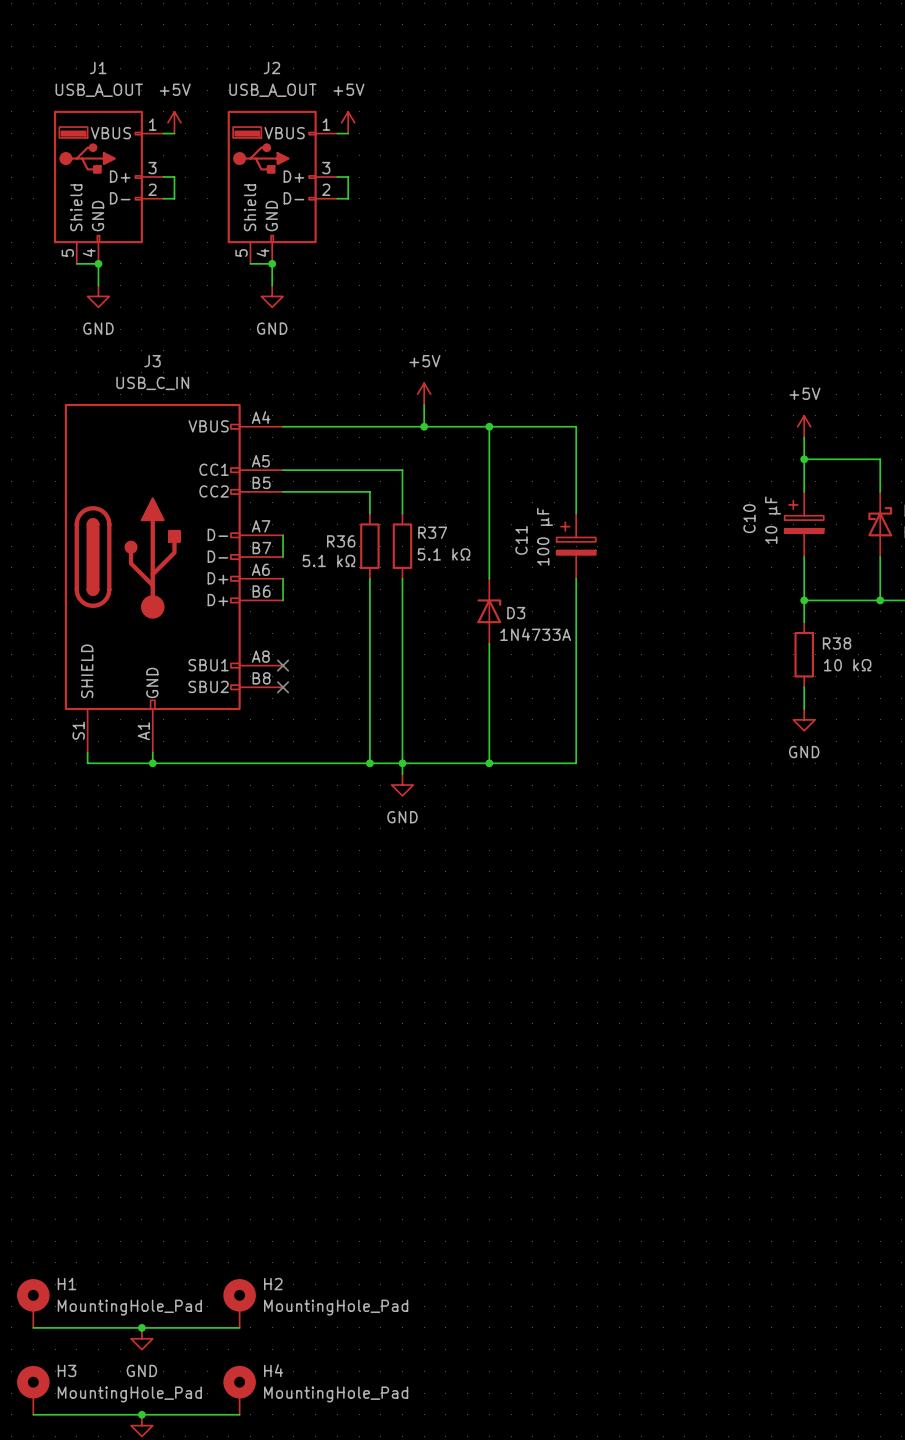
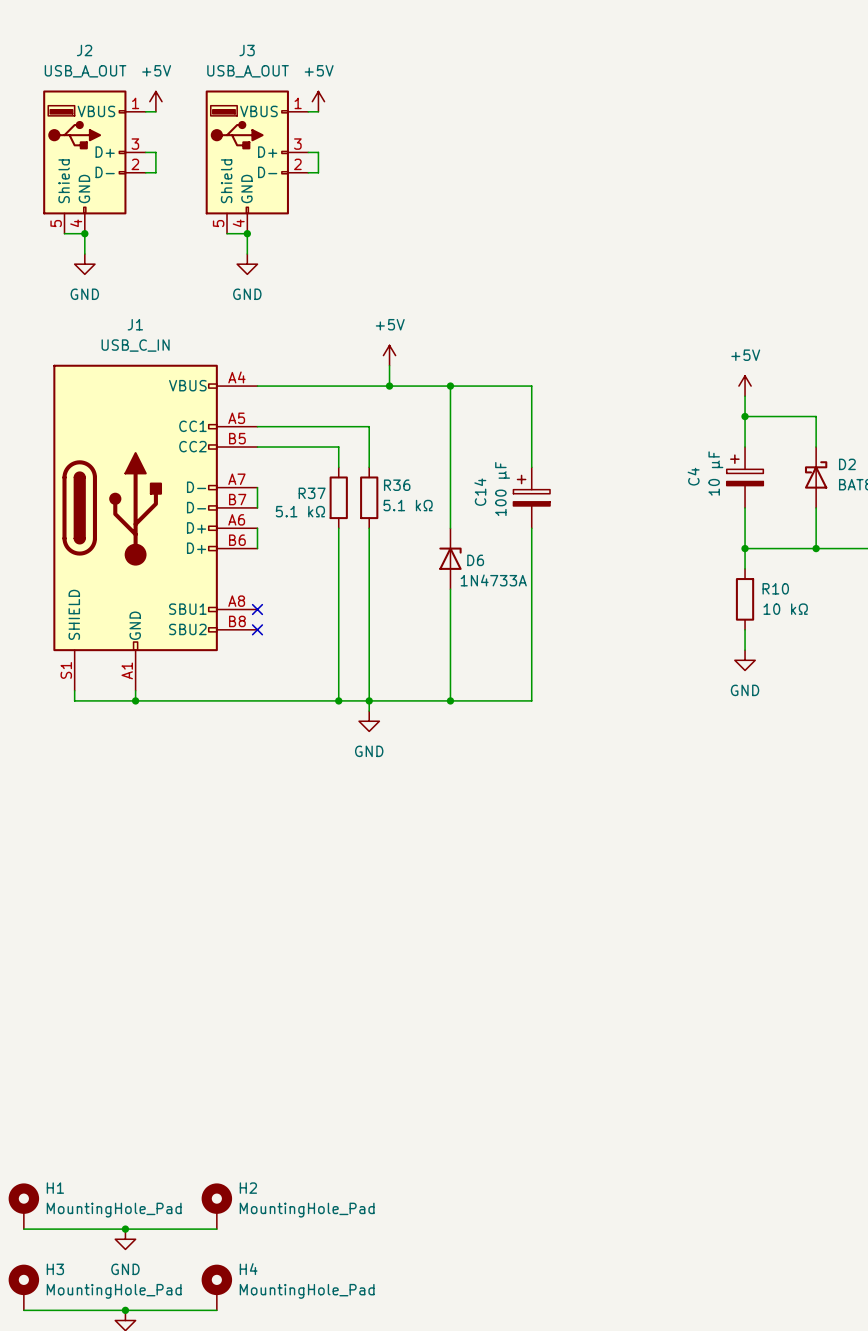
J1 name: J1 (98, 68) -> J2 (84, 50)
J2 name: J2 (271, 68) -> J3 (247, 50)
J3 name: J3 (152, 361) -> J1 (135, 324)
C10 name: C10 (749, 518) -> C4 (693, 476)
R37 name: R37 (432, 532) -> R36 (397, 485)
C11 name: C11 (521, 540) -> C14 (480, 492)
R36 name: R36 (341, 541) -> R37 (312, 493)
D3 name: D3 (516, 613) -> D6 (475, 560)
R38 name: R38 (837, 643) -> R10 (775, 588)

